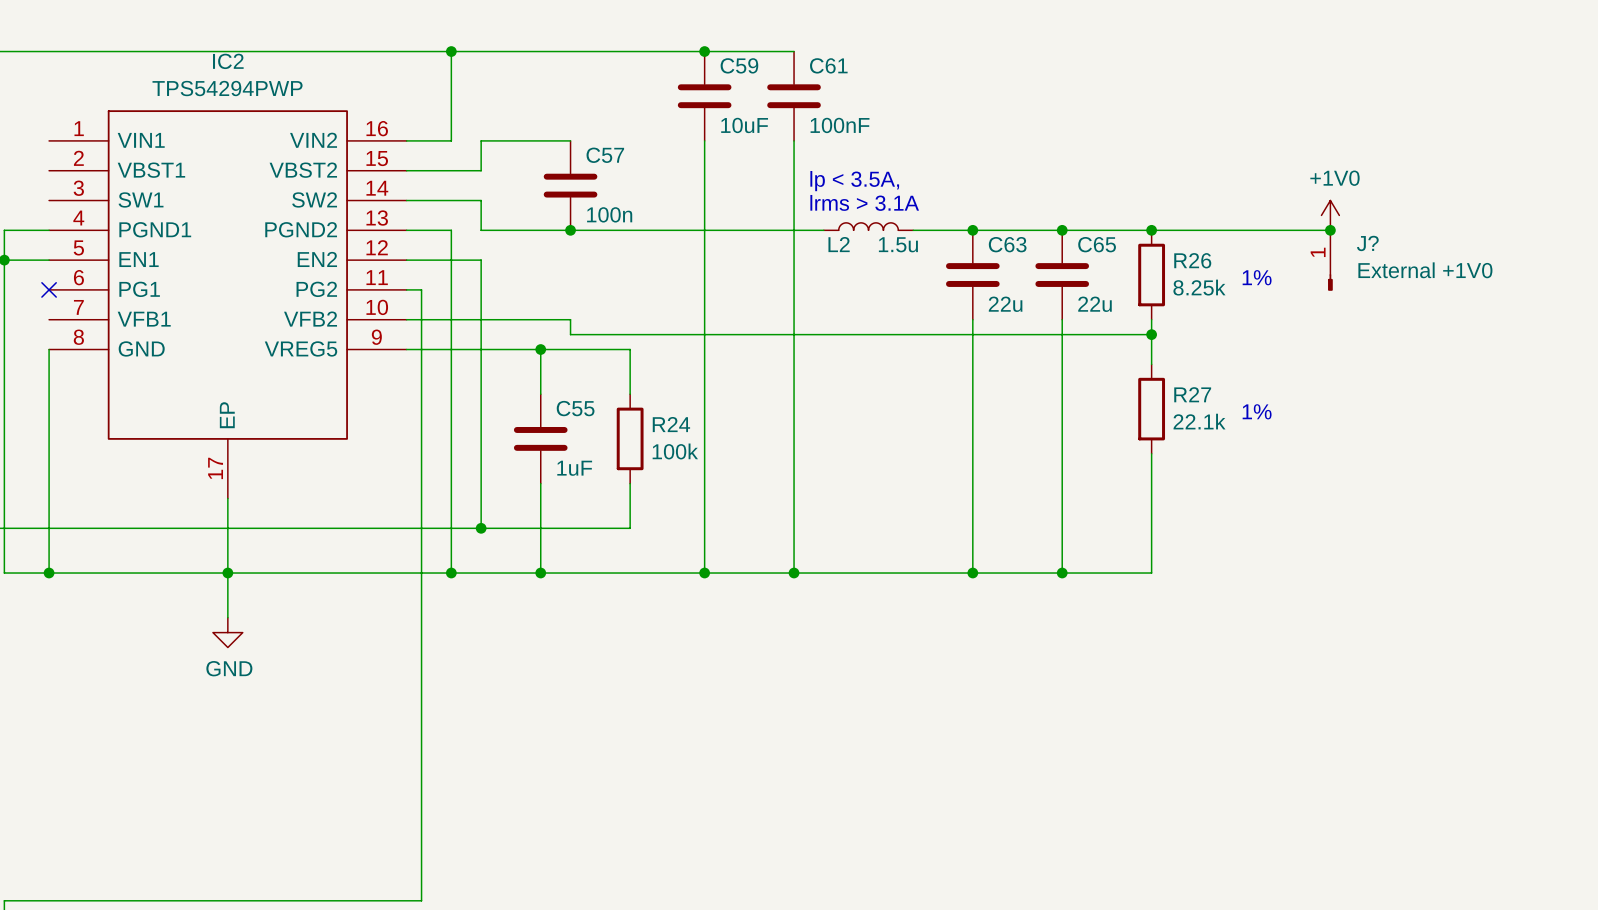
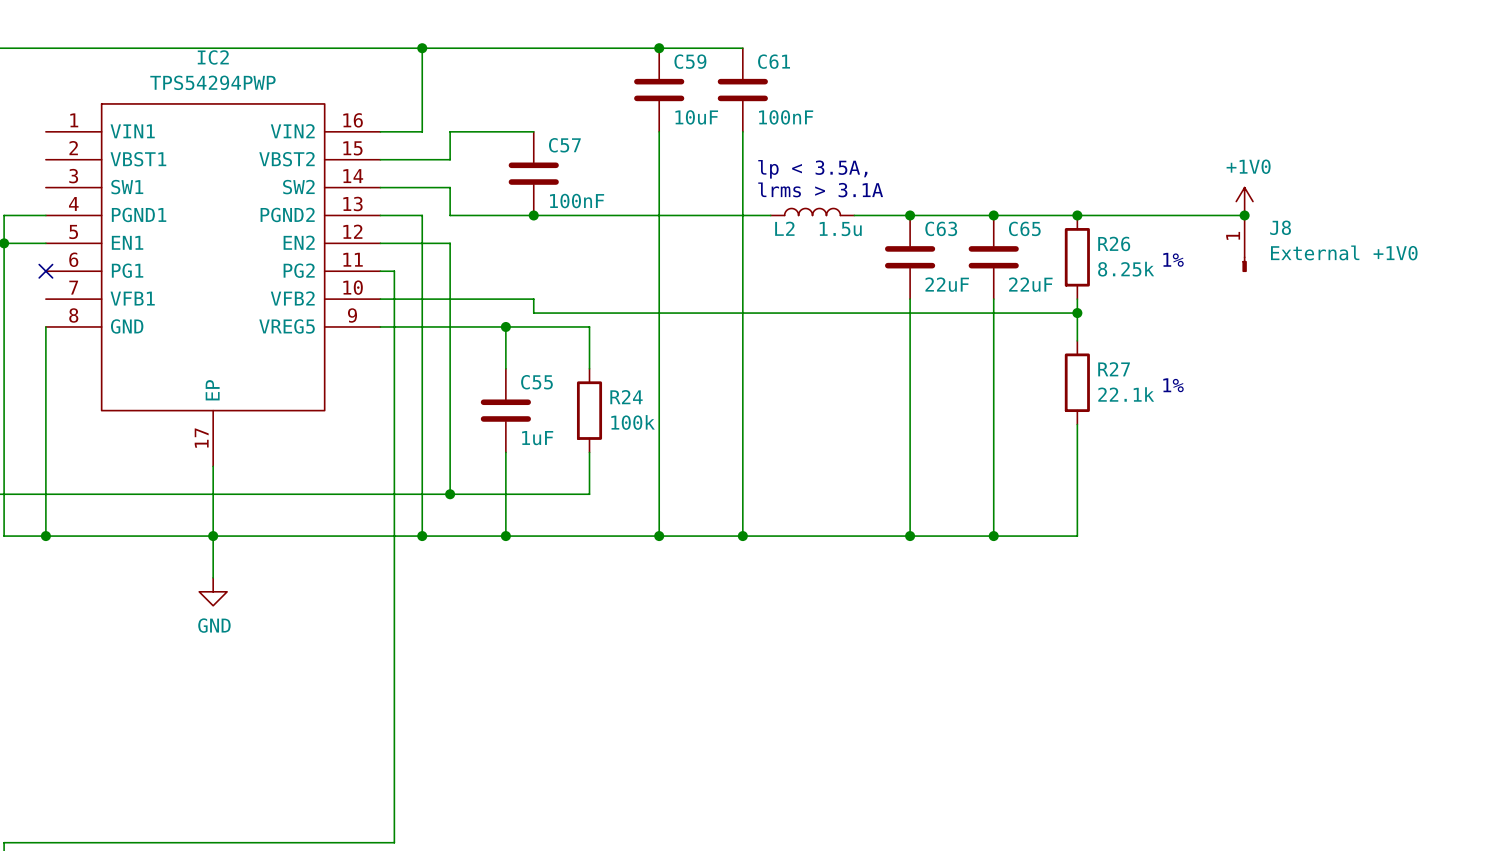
C57 value: 100n (609, 214) -> 100nF (577, 201)
J? name: J? (1367, 243) -> J8 (1280, 227)
C63 value: 22u (1005, 304) -> 22uF (947, 284)
C65 value: 22u (1095, 304) -> 22uF (1030, 284)

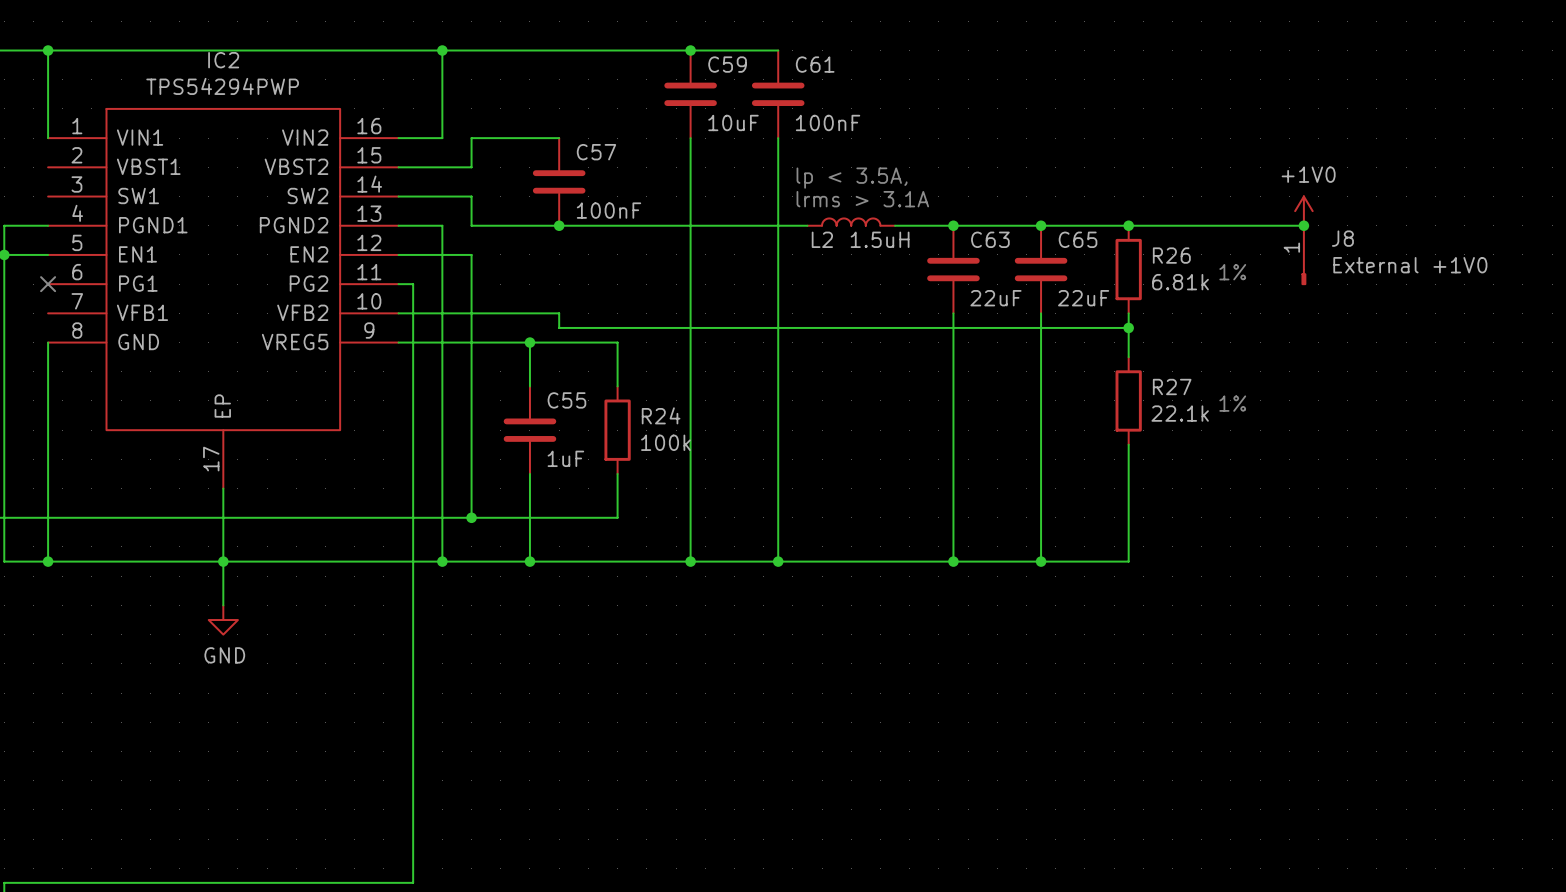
wire: none -> (48, 50) (48, 138)
junction: none -> (48, 50)
L2 value: 1.5u (840, 229) -> 1.5uH (880, 239)
R26 value: 8.25k (1126, 269) -> 6.81k (1180, 282)

